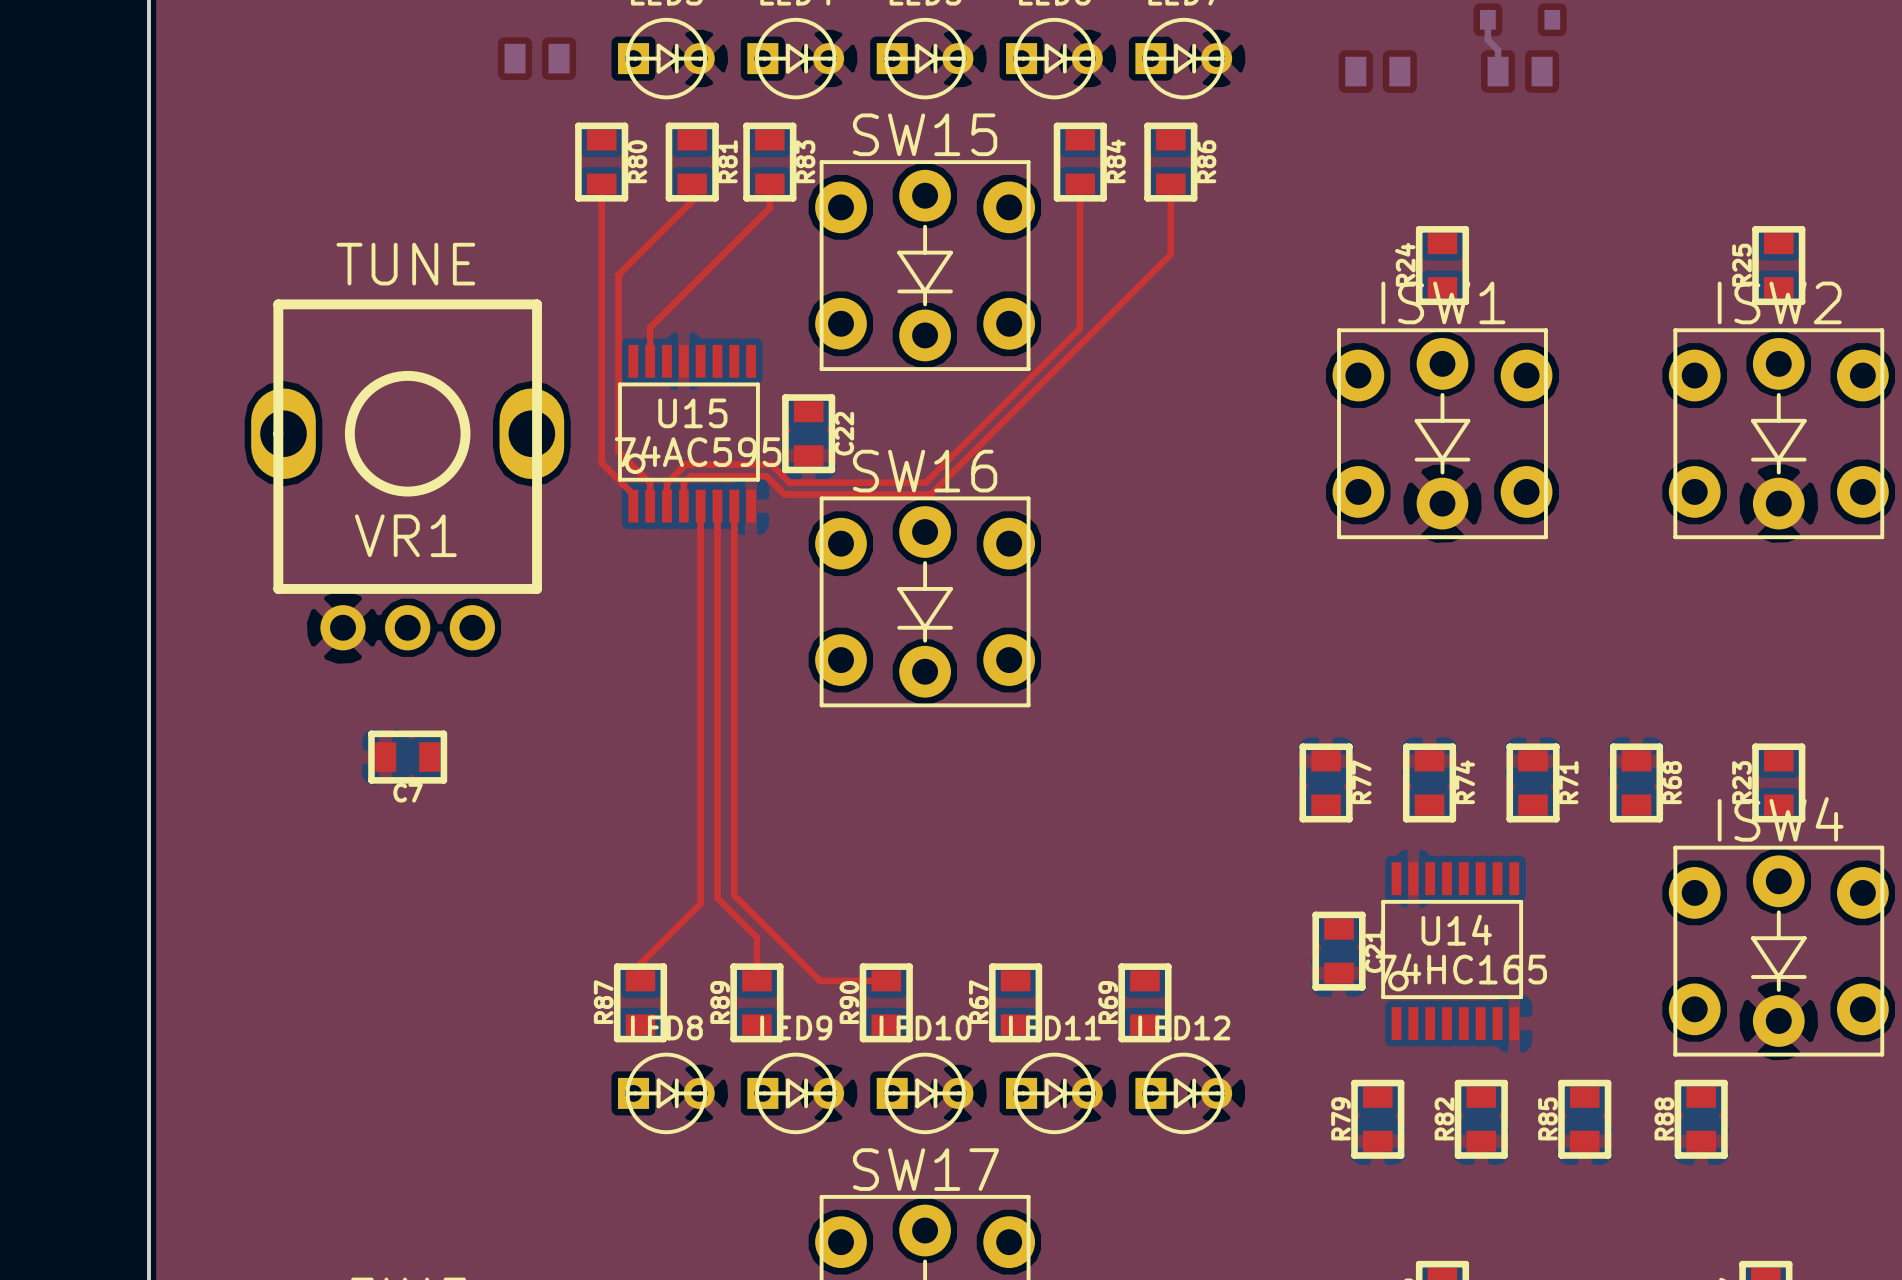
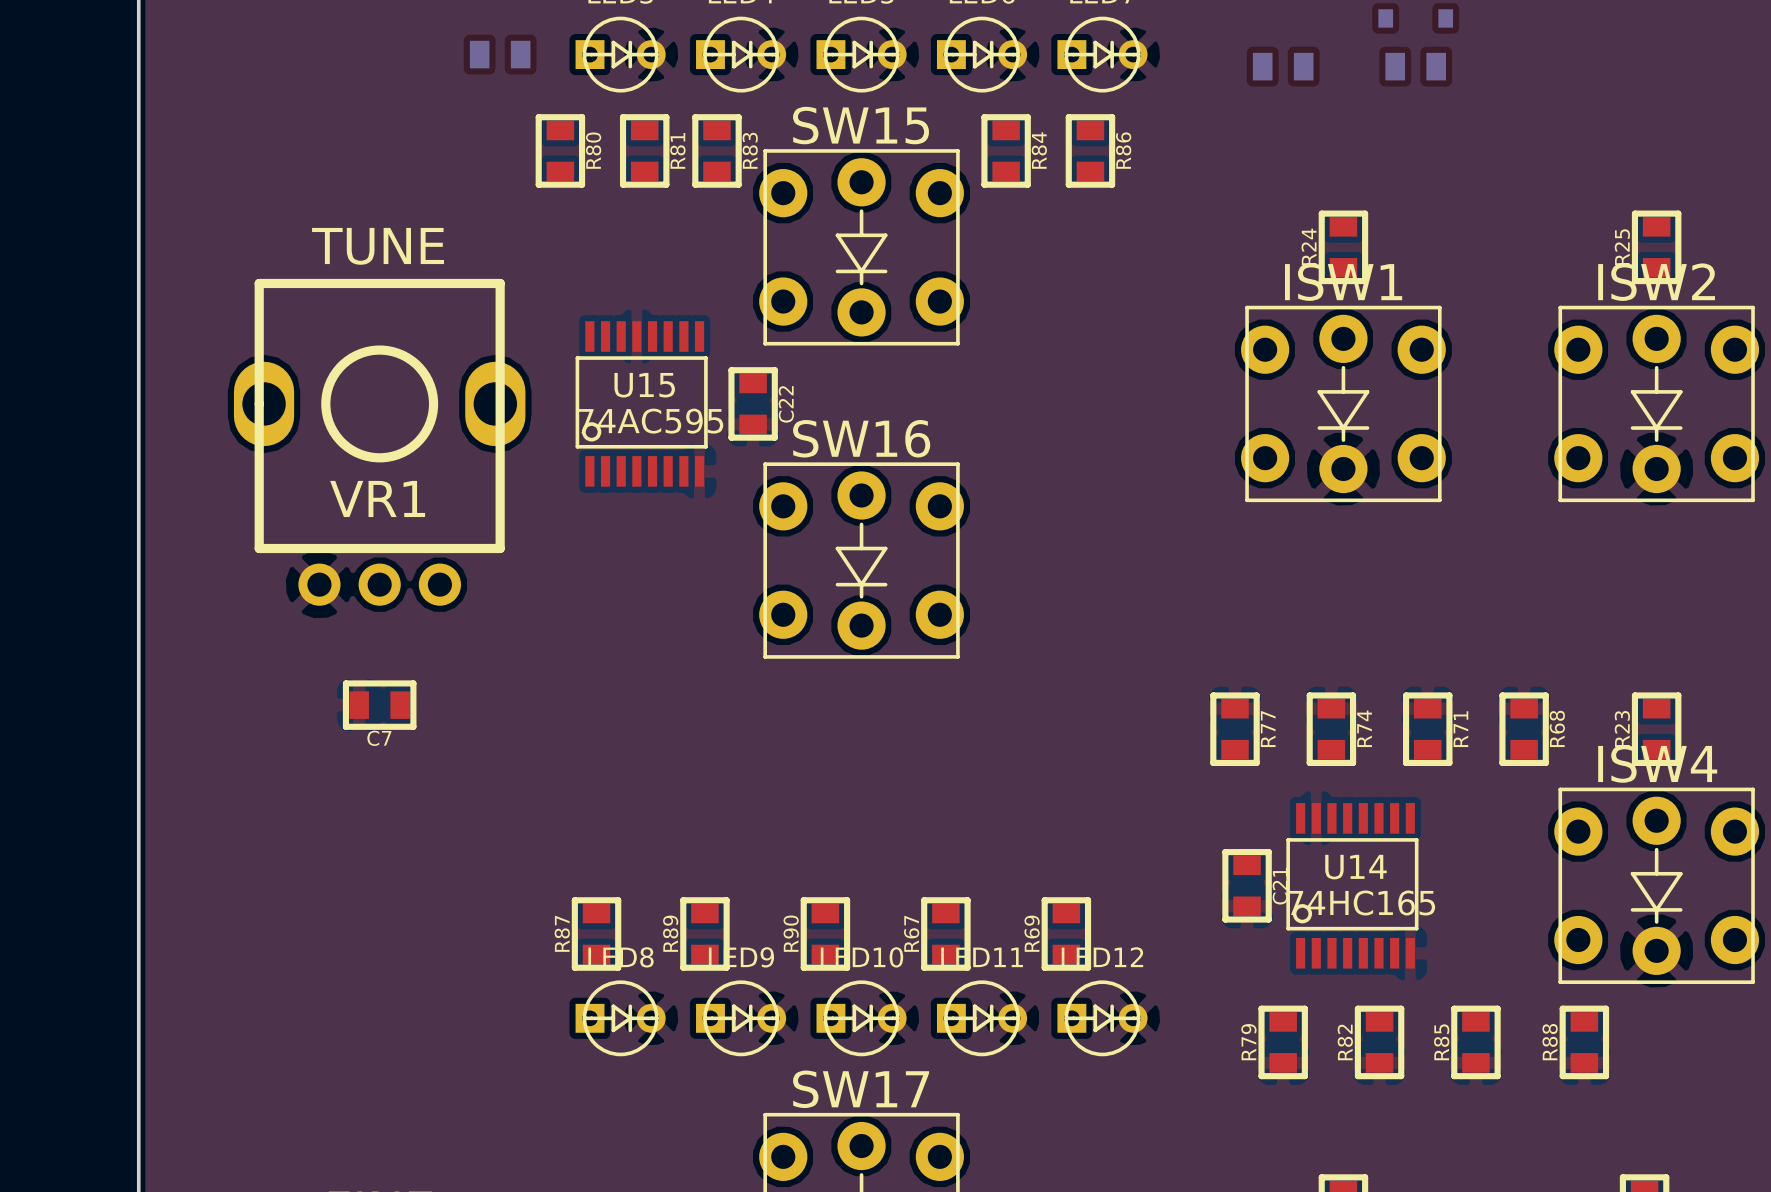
bottom track: (1487, 19) (1487, 40) (1498, 50) (1498, 71) -> none
top track: (1080, 183) (1080, 328) (925, 482) (789, 482) (771, 464) (685, 464) (667, 483) (667, 506) -> none
top track: (601, 184) (601, 462) (633, 494) (633, 506) -> none
top track: (692, 184) (692, 201) (618, 274) (618, 451) (650, 483) (650, 506) -> none
top track: (769, 184) (769, 207) (650, 327) (650, 361) -> none
top track: (1170, 184) (1170, 254) (930, 494) (784, 494) (766, 476) (690, 476) (683, 483) (683, 506) -> none
top track: (700, 506) (700, 903) (640, 963) (640, 980) -> none
top track: (717, 506) (717, 897) (756, 937) (756, 980) -> none
top track: (734, 506) (734, 895) (819, 980) (886, 980) -> none

